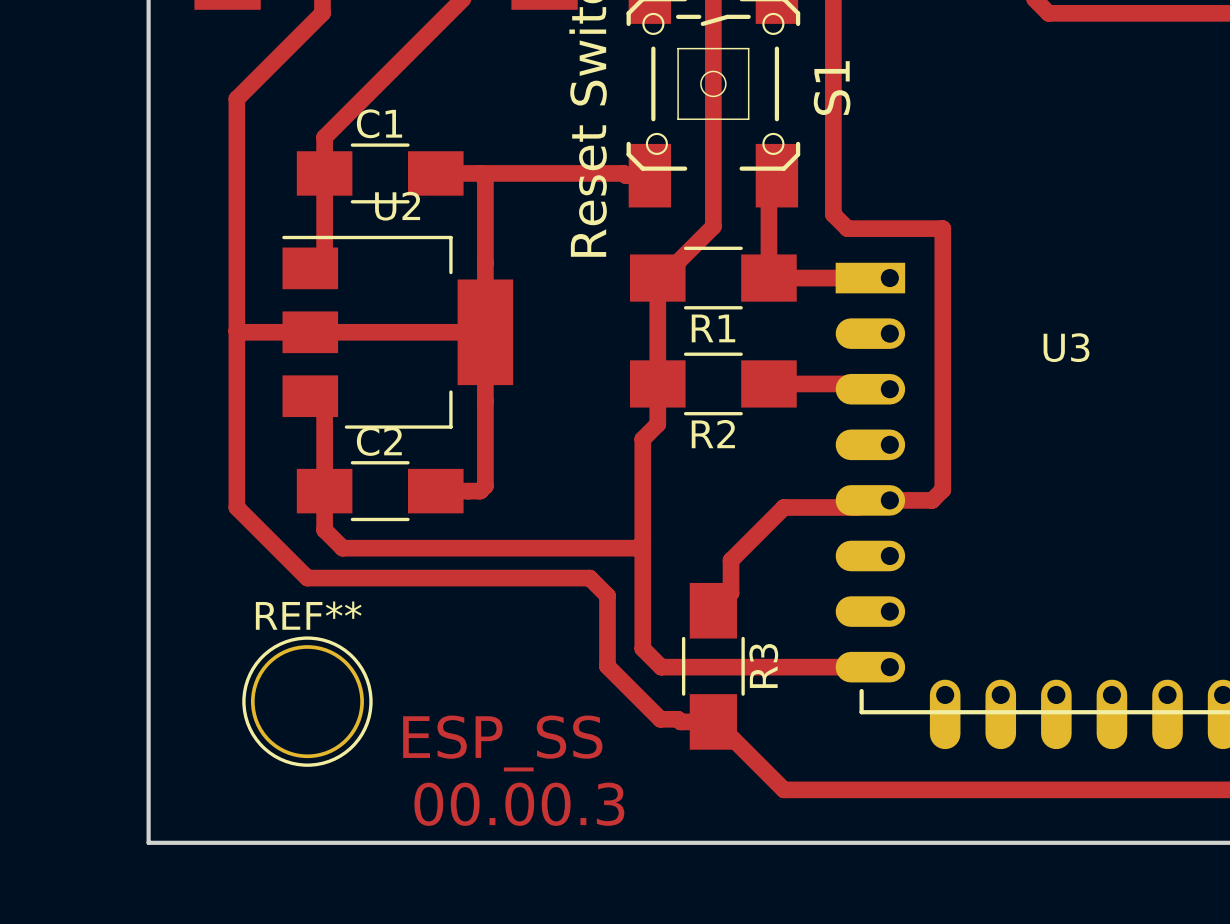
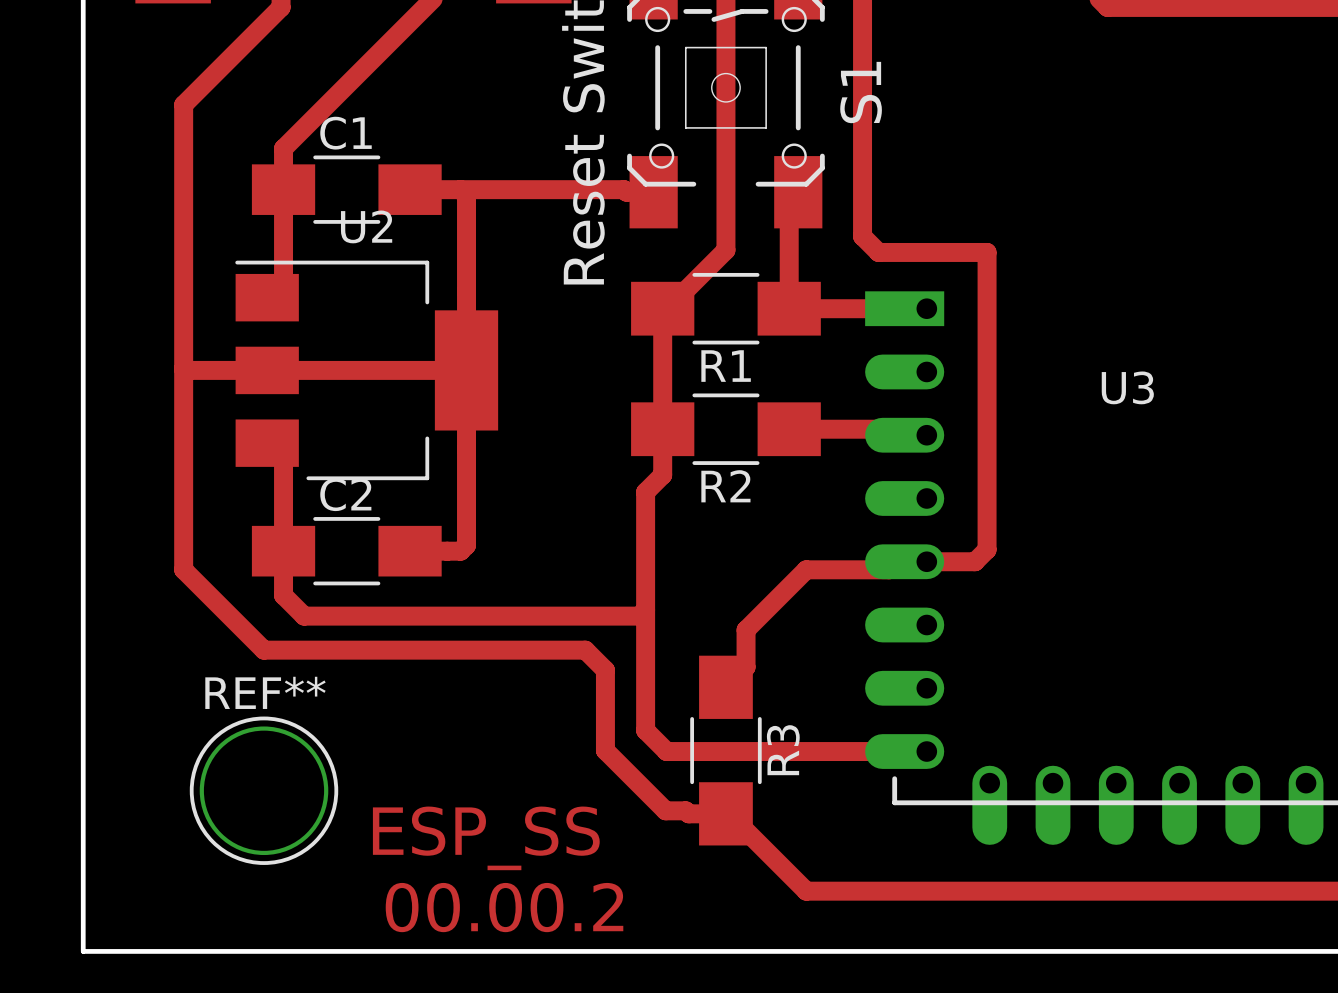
text: 00.00.3 (519, 804) -> 00.00.2 (504, 907)

